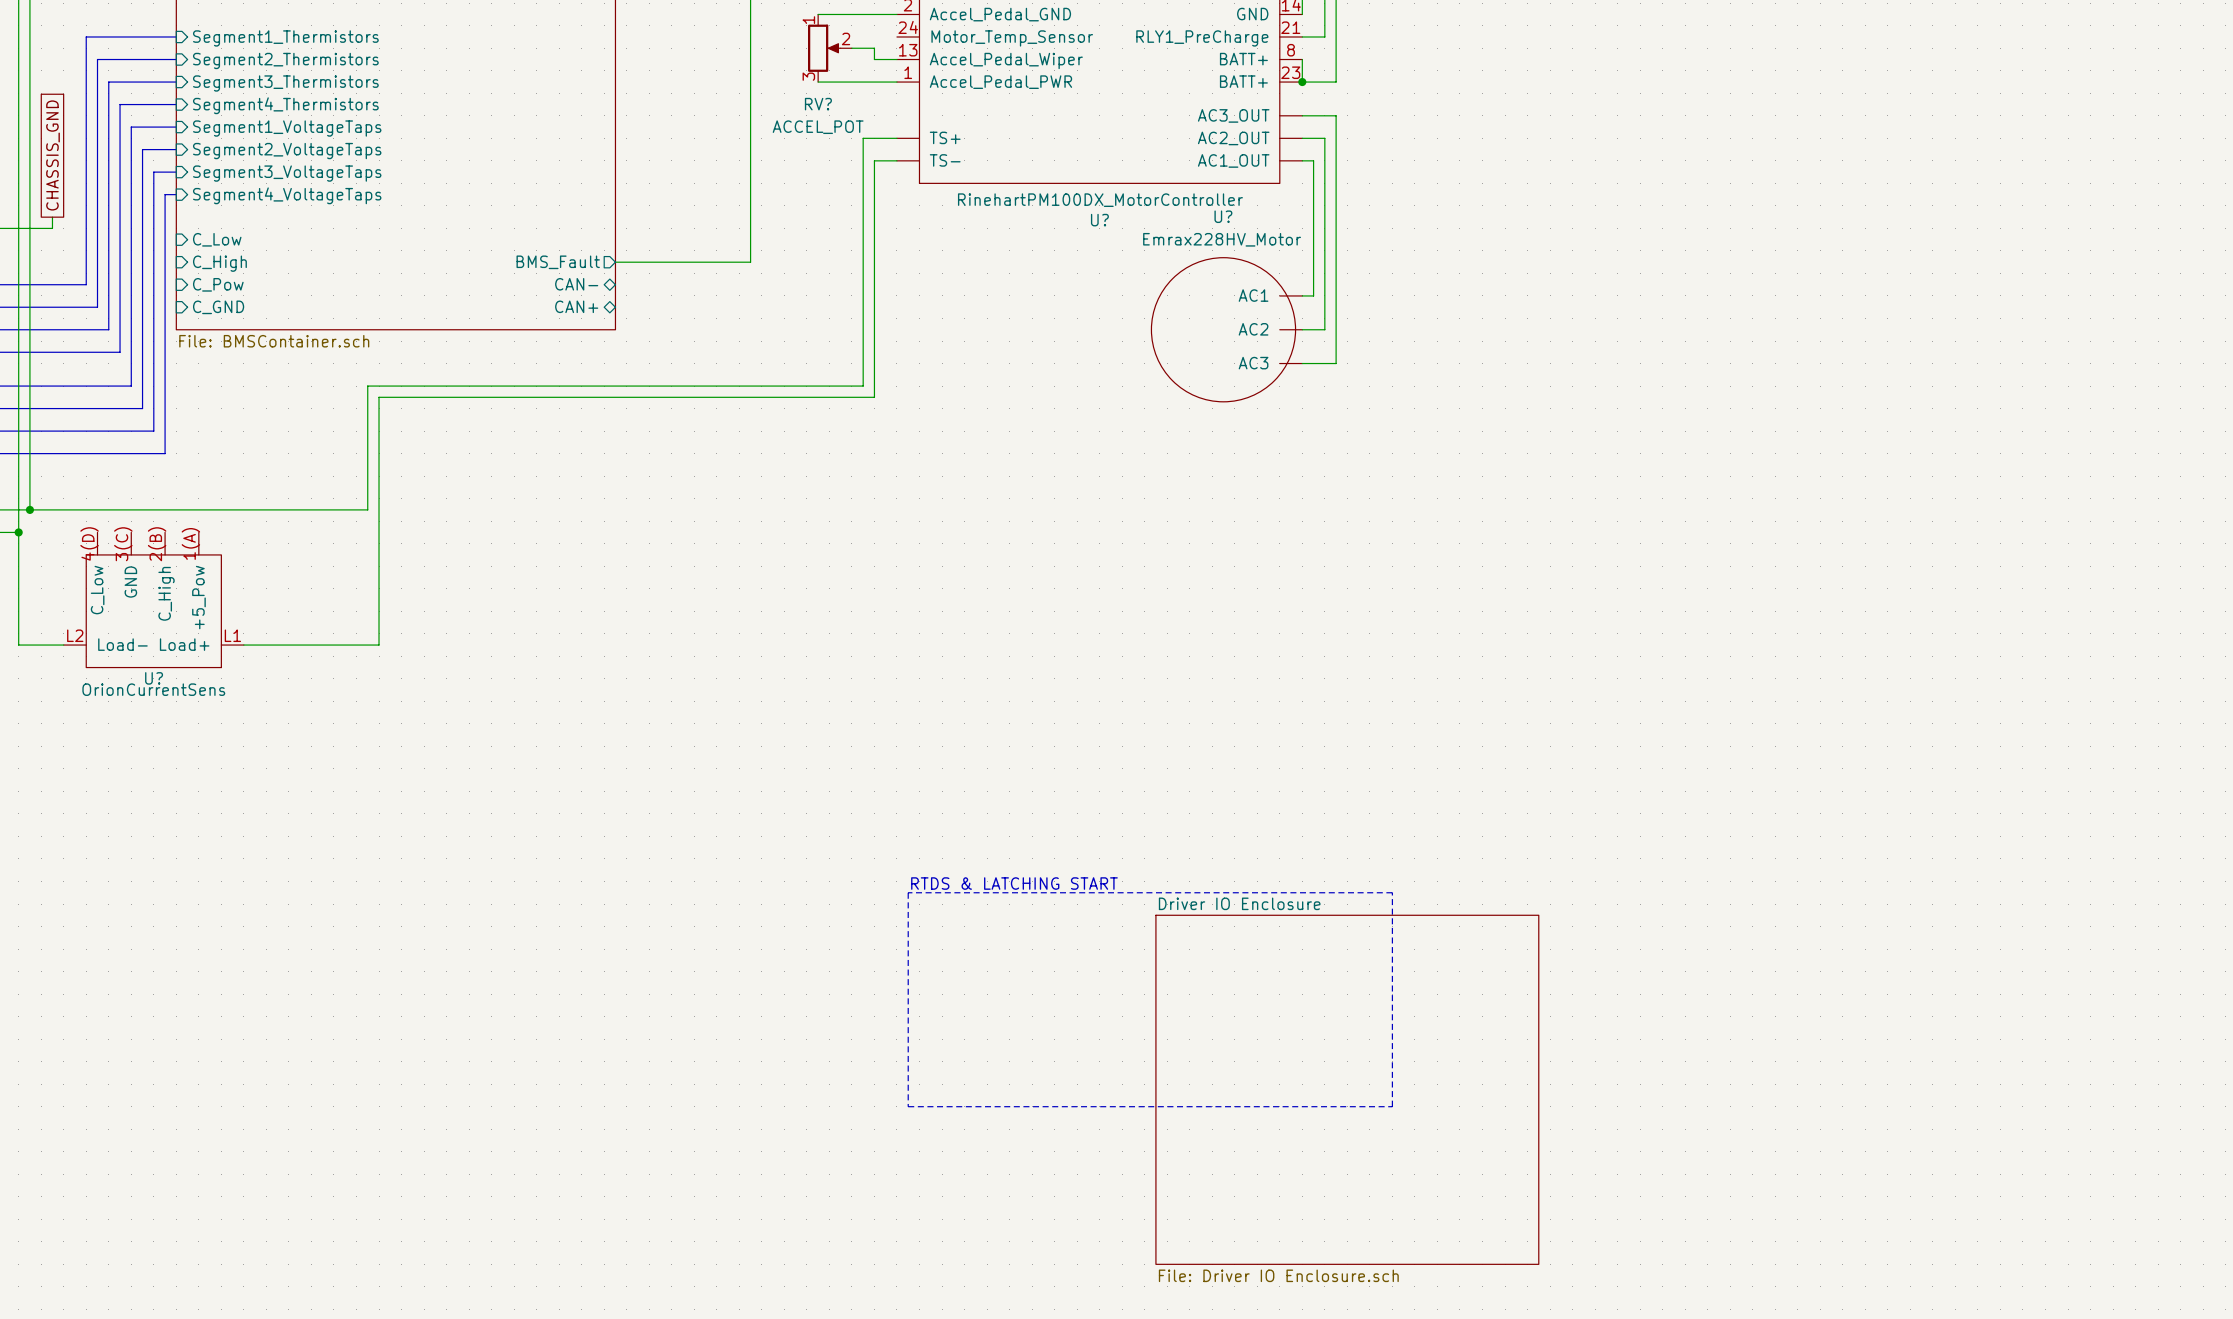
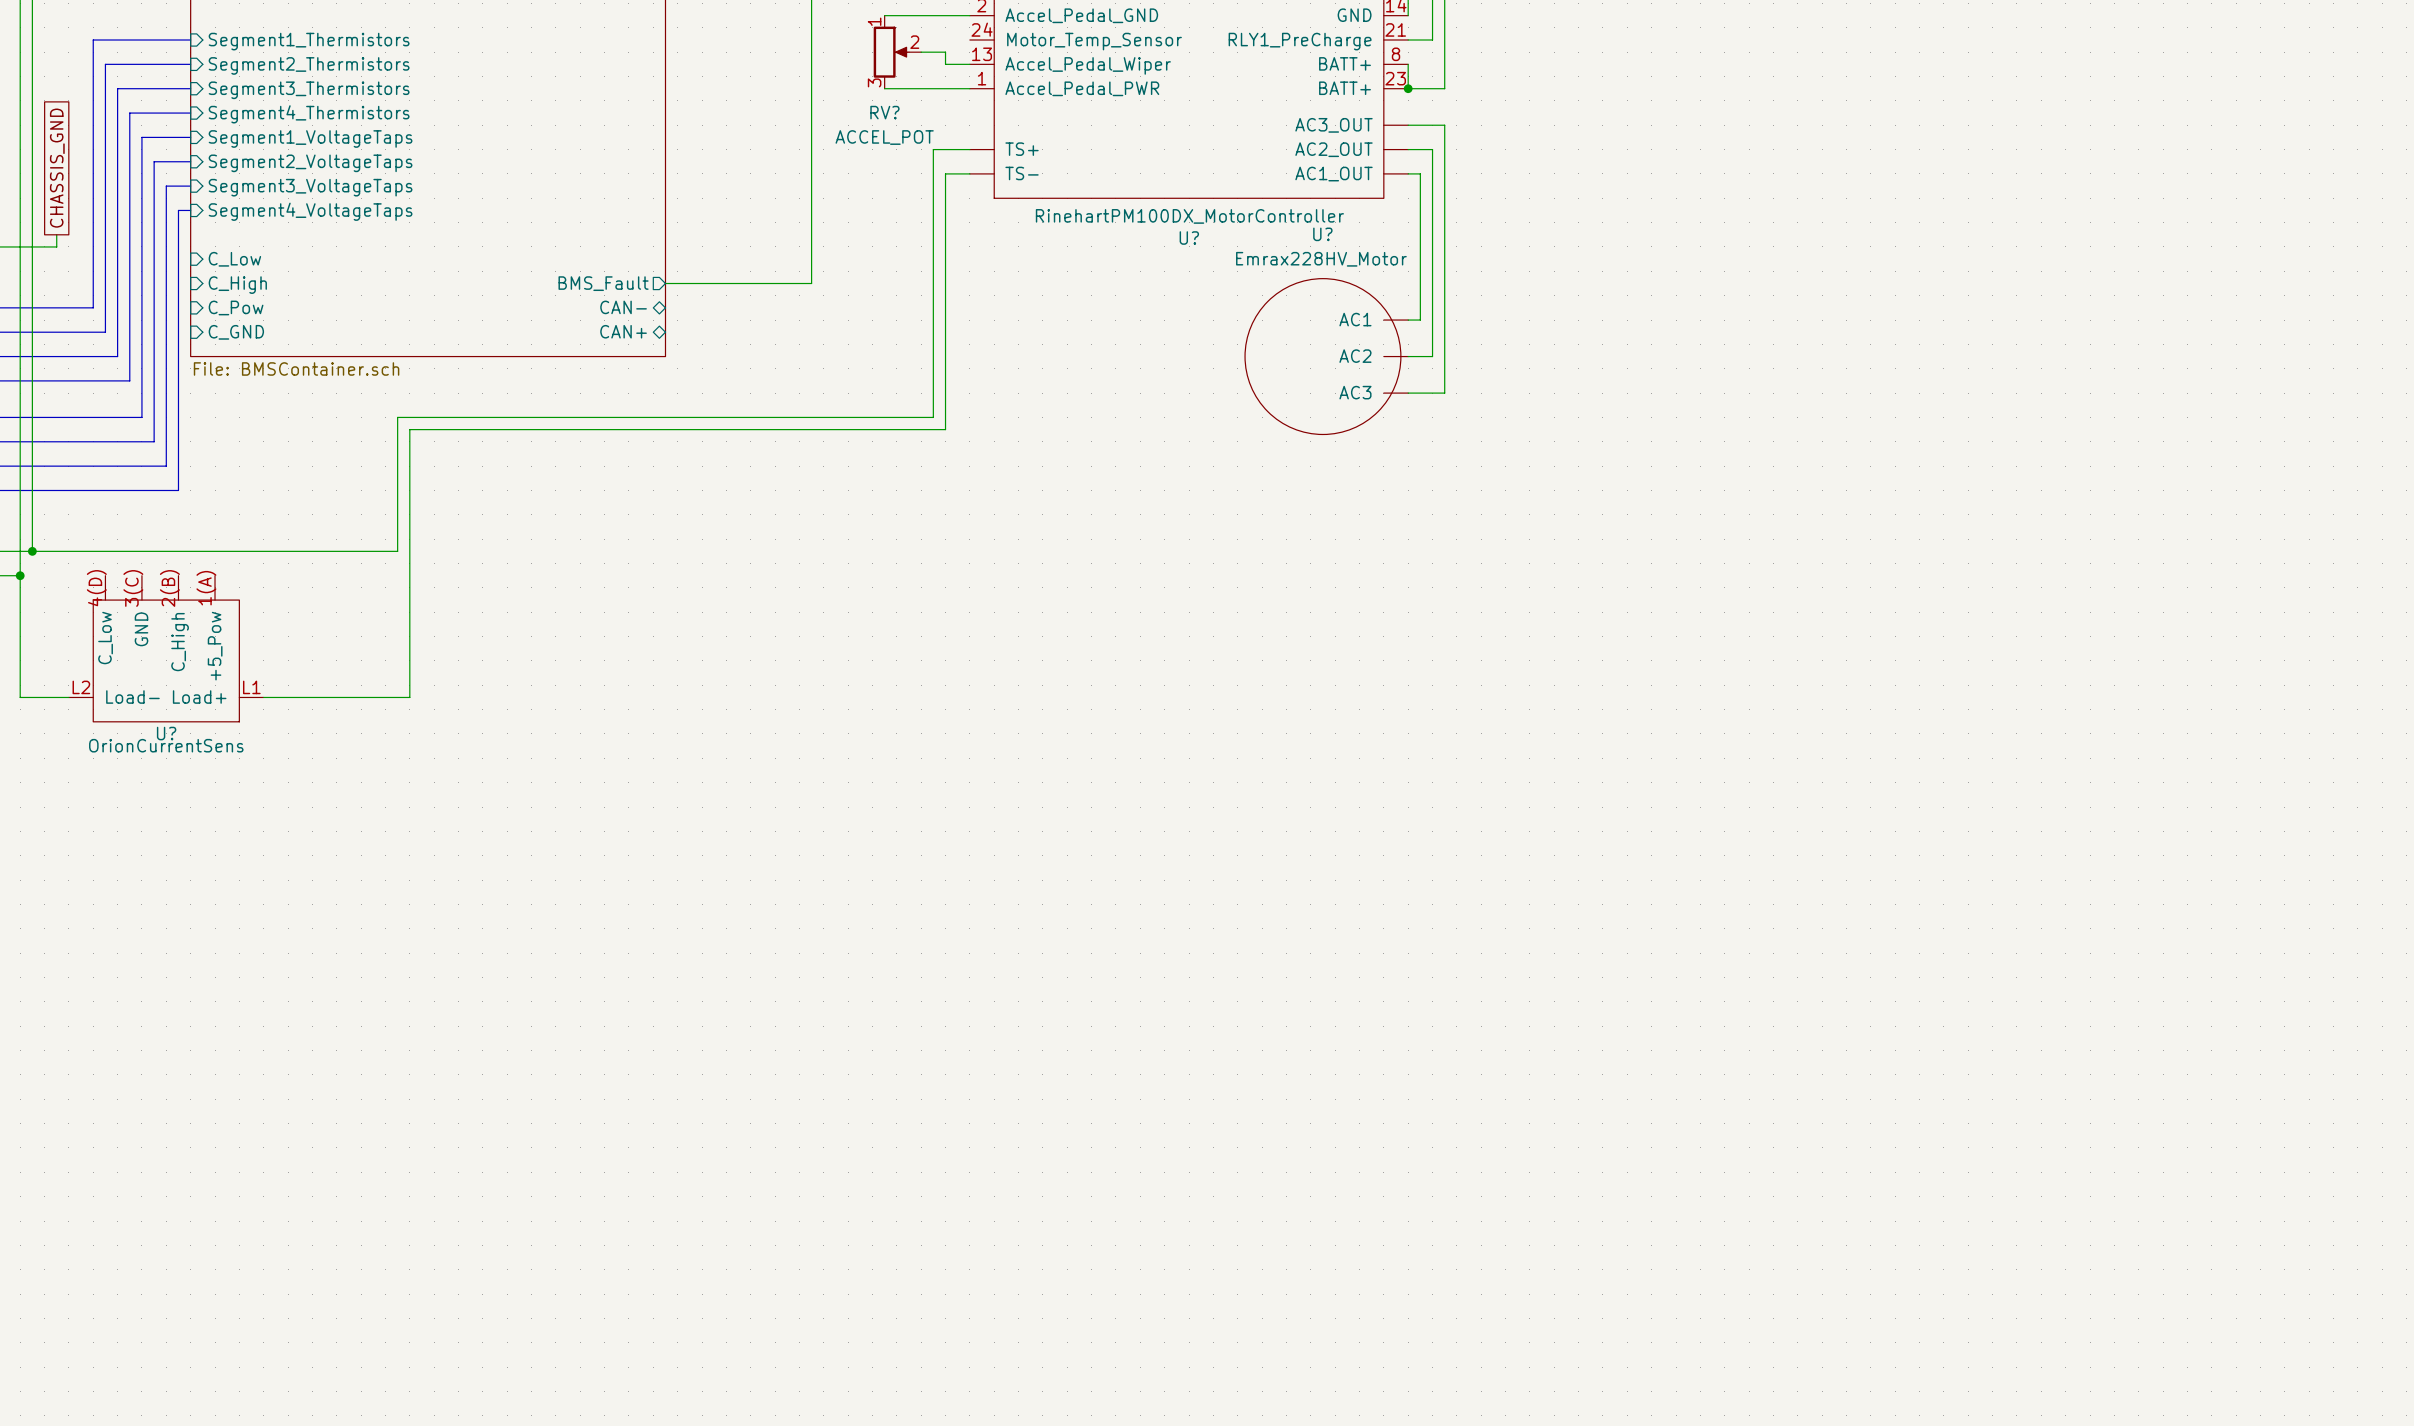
text: RTDS & LATCHING START (1014, 883) -> none
line: (908, 892) (1392, 892) (1392, 1106) (908, 1106) (908, 892) -> none
sheet Driver IO Enclosure: File: Driver IO Enclosure.sch (1347, 1089) -> none

